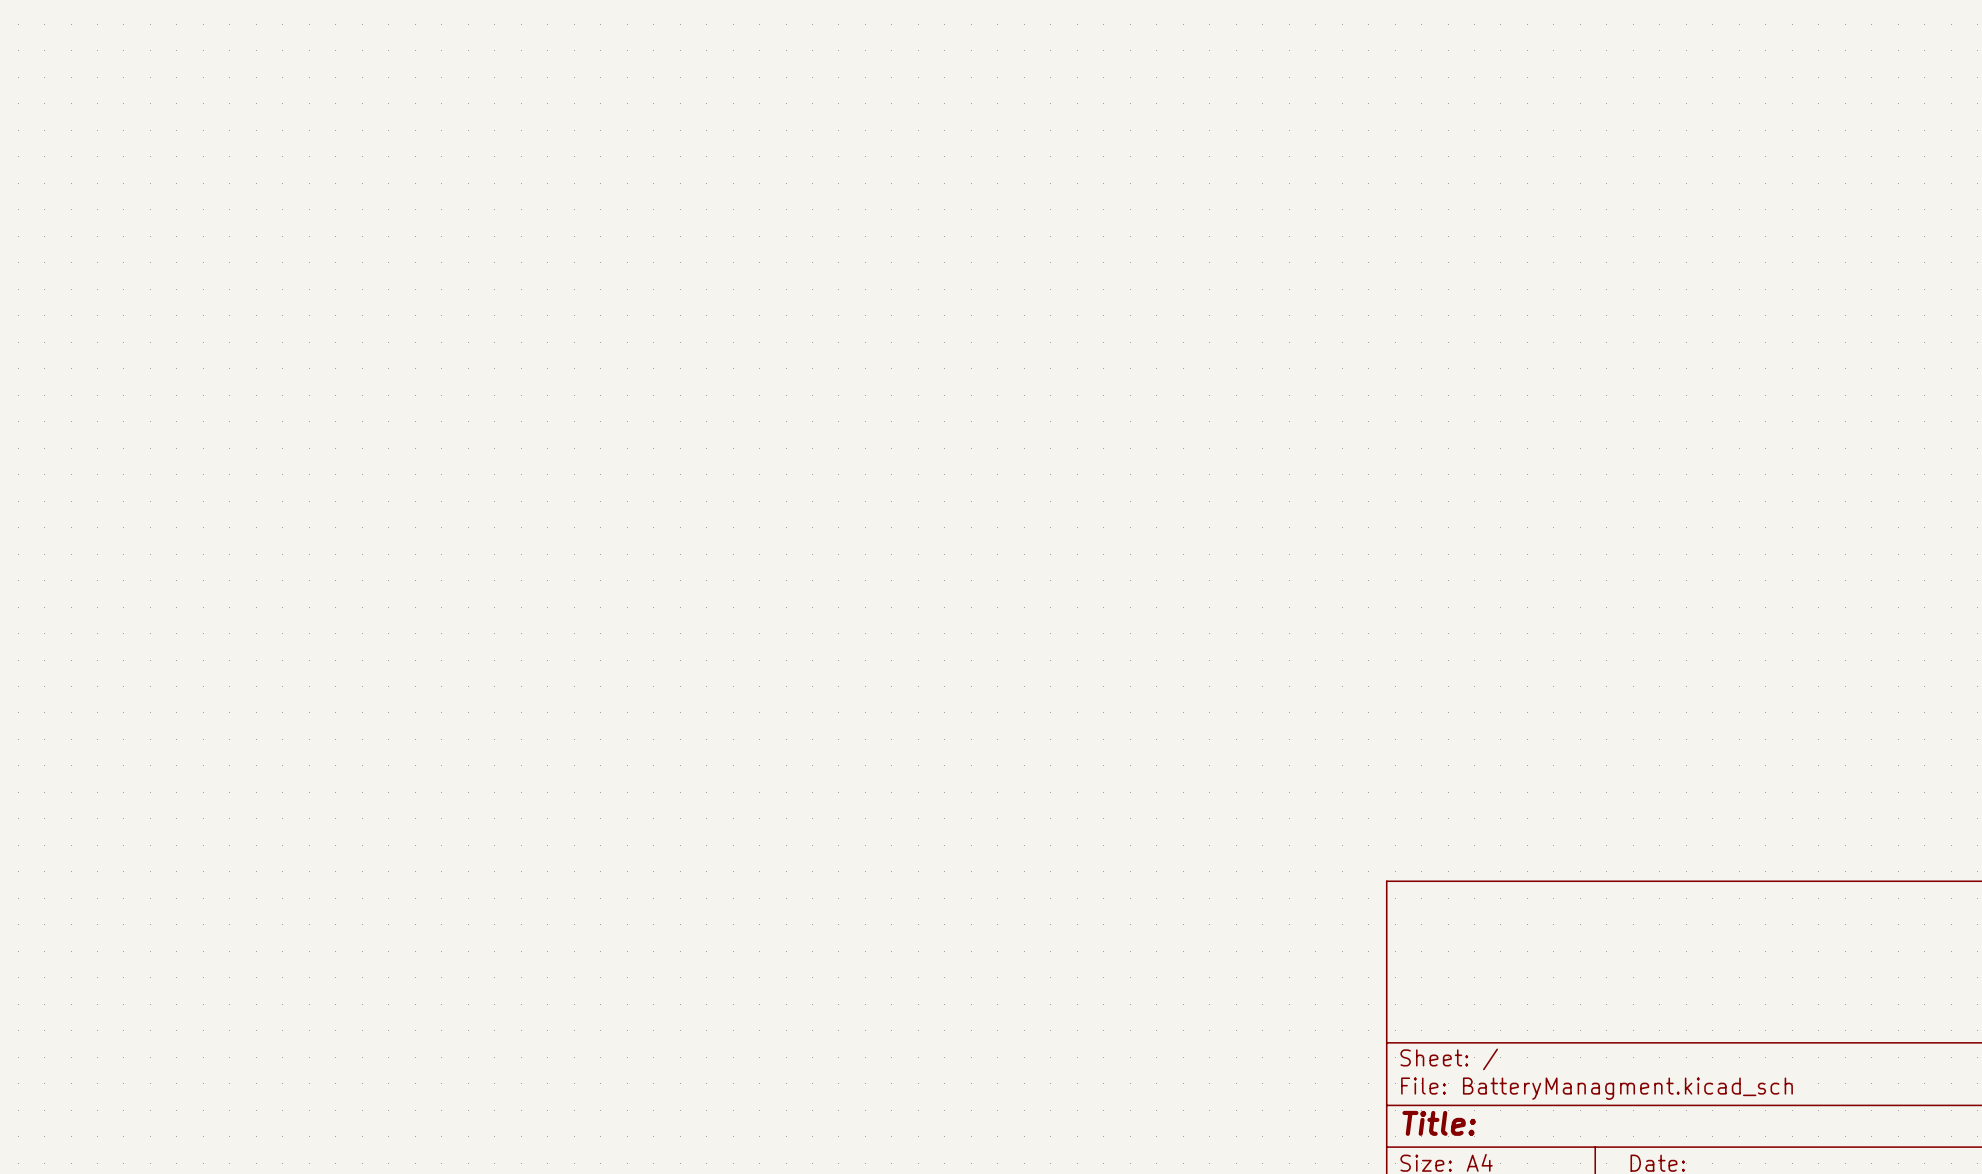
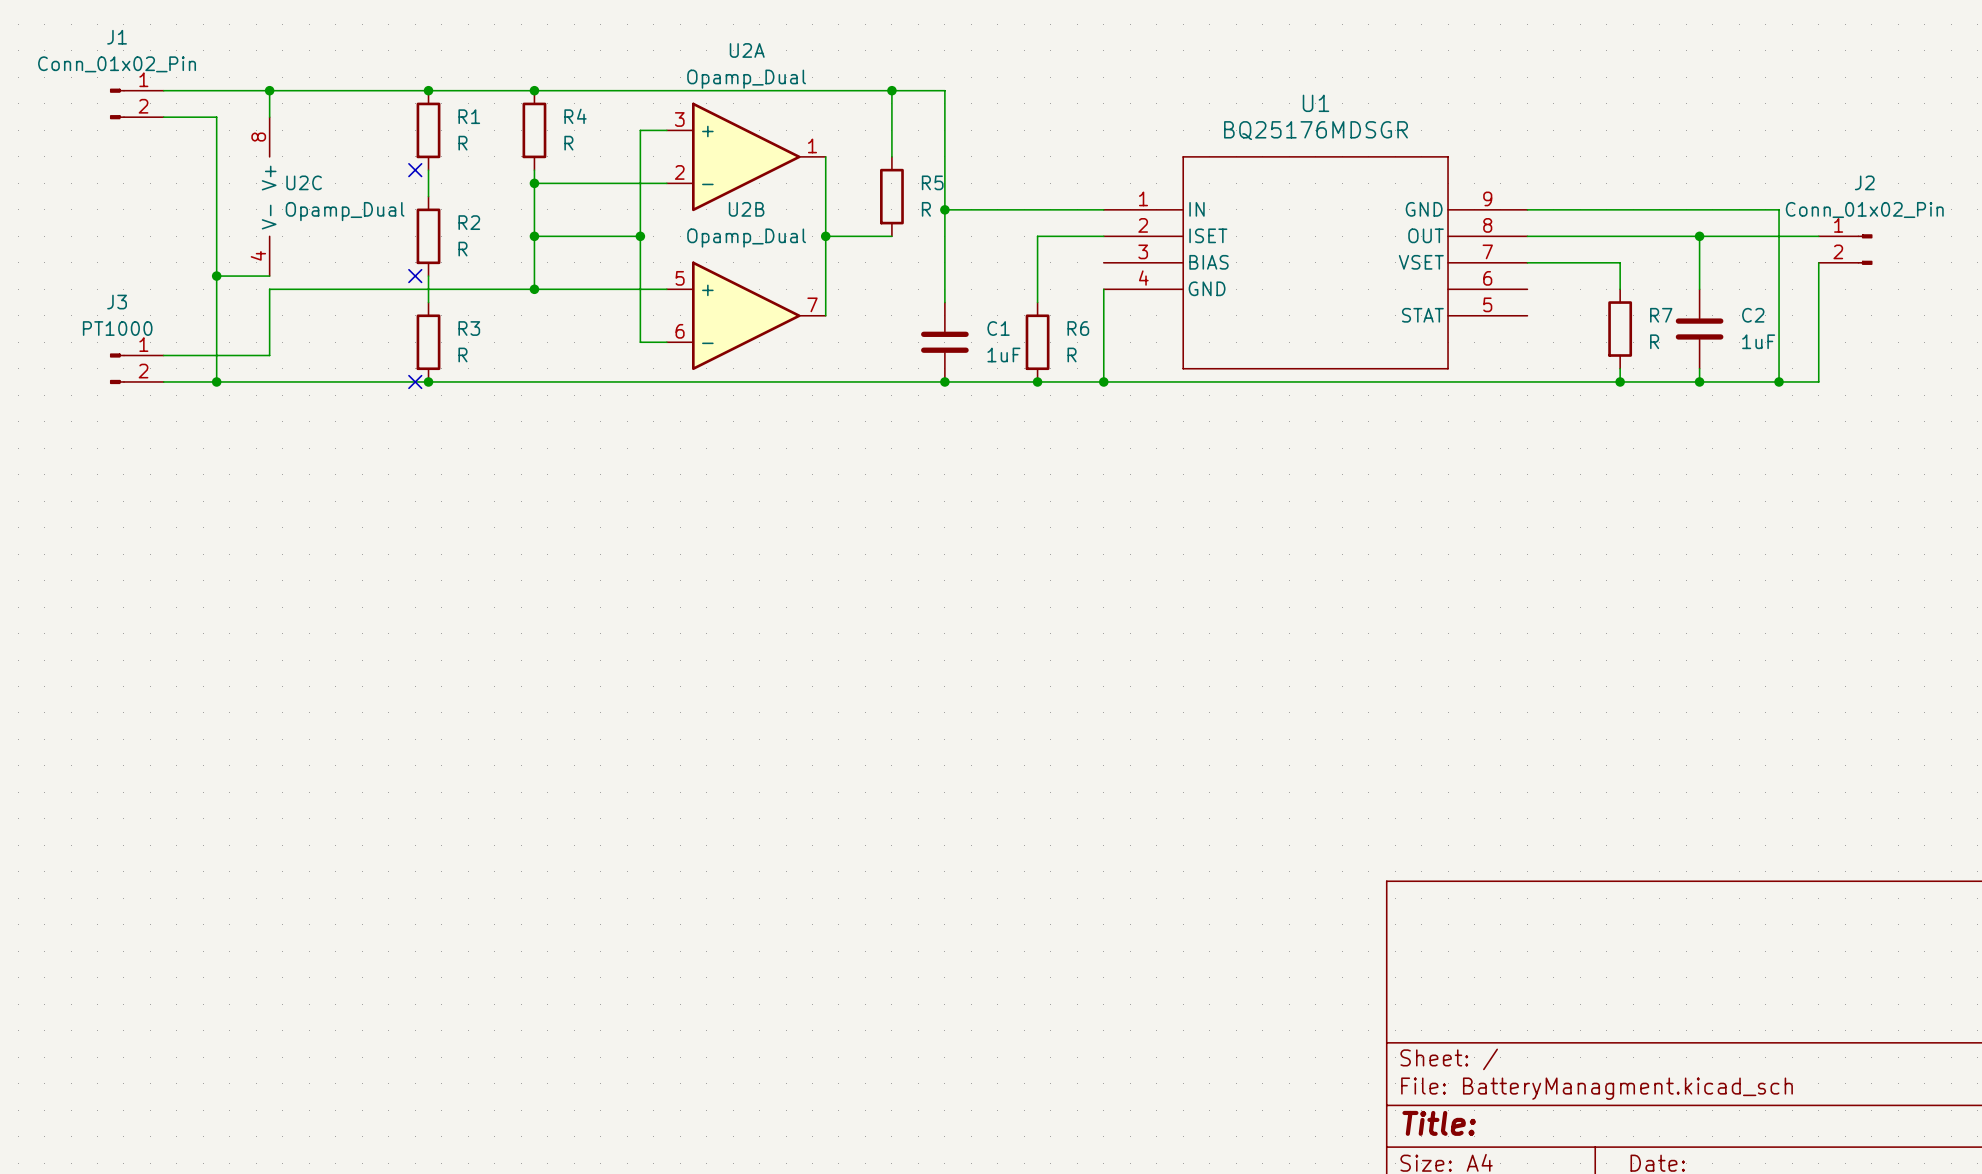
wire: none -> (163, 90) (944, 90) (944, 302)
wire: none -> (269, 90) (269, 117)
junction: none -> (269, 90)
junction: none -> (428, 90)
junction: none -> (534, 90)
wire: none -> (891, 90) (891, 156)
junction: none -> (891, 90)
J1: none -> Conn_01x02_Pin (136, 103)
wire: none -> (163, 117) (216, 117) (216, 381)
R1: none -> R (428, 130)
R4: none -> R (534, 130)
wire: none -> (666, 130) (640, 130) (640, 342) (666, 342)
U2A: none -> Opamp_Dual (746, 156)
wire: none -> (825, 156) (825, 315)
no-connect mark: none -> (415, 170)
wire: none -> (428, 170) (428, 196)
wire: none -> (534, 170) (534, 289)
wire: none -> (534, 183) (666, 183)
junction: none -> (534, 183)
U2C: none -> Opamp_Dual (269, 196)
R5: none -> R (891, 196)
wire: none -> (944, 209) (1103, 209)
junction: none -> (944, 209)
wire: none -> (1527, 209) (1779, 209) (1779, 381)
R2: none -> R (428, 236)
wire: none -> (534, 236) (640, 236)
junction: none -> (534, 236)
junction: none -> (640, 236)
wire: none -> (825, 236) (891, 236)
junction: none -> (825, 236)
wire: none -> (1103, 236) (1037, 236) (1037, 302)
wire: none -> (1527, 236) (1818, 236)
wire: none -> (1699, 236) (1699, 289)
junction: none -> (1699, 236)
J2: none -> Conn_01x02_Pin (1845, 249)
U1: none -> BQ25176MDSGR (1315, 262)
wire: none -> (1527, 262) (1620, 262) (1620, 289)
wire: none -> (1818, 262) (1818, 381) (163, 381)
wire: none -> (216, 276) (269, 276)
junction: none -> (216, 276)
no-connect mark: none -> (415, 276)
wire: none -> (428, 276) (428, 302)
junction: none -> (534, 289)
wire: none -> (666, 289) (269, 289) (269, 355) (163, 355)
wire: none -> (1103, 289) (1103, 381)
U2B: none -> Opamp_Dual (746, 315)
R7: none -> R (1620, 329)
C2: none -> 1uF (1699, 329)
R3: none -> R (428, 342)
C1: none -> 1uF (944, 342)
R6: none -> R (1037, 342)
J3: none -> PT1000 (136, 368)
wire: none -> (1620, 368) (1620, 381)
wire: none -> (1699, 368) (1699, 381)
junction: none -> (216, 381)
no-connect mark: none -> (415, 381)
junction: none -> (428, 381)
junction: none -> (944, 381)
junction: none -> (1037, 381)
junction: none -> (1103, 381)
junction: none -> (1620, 381)
junction: none -> (1699, 381)
junction: none -> (1779, 381)

